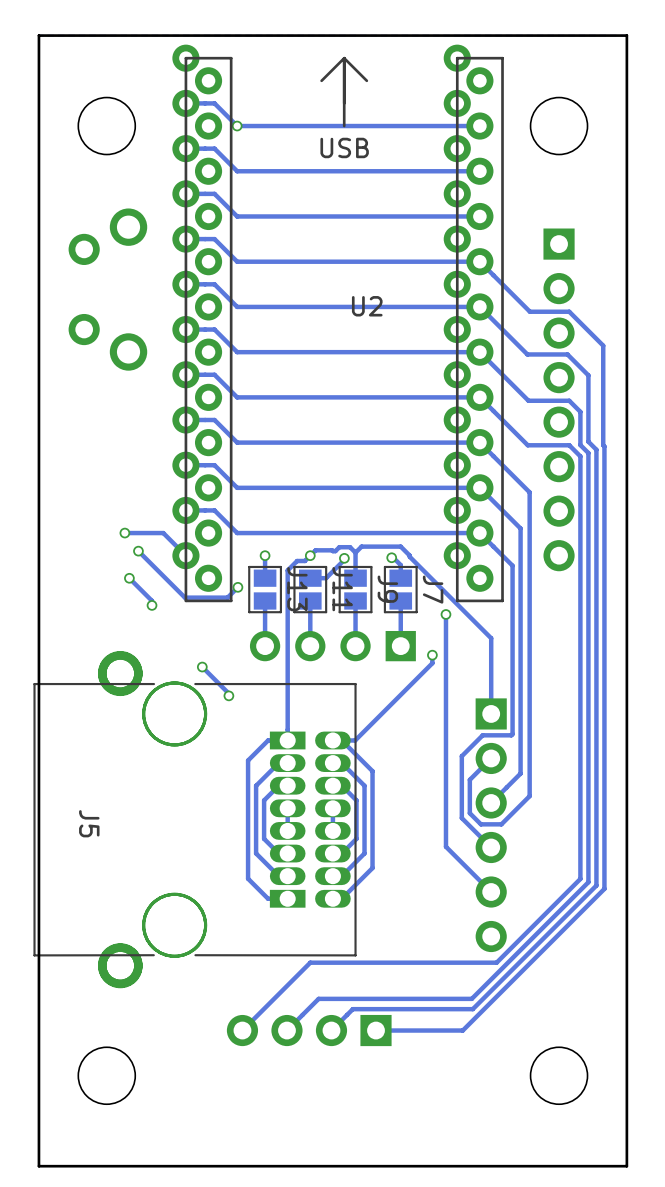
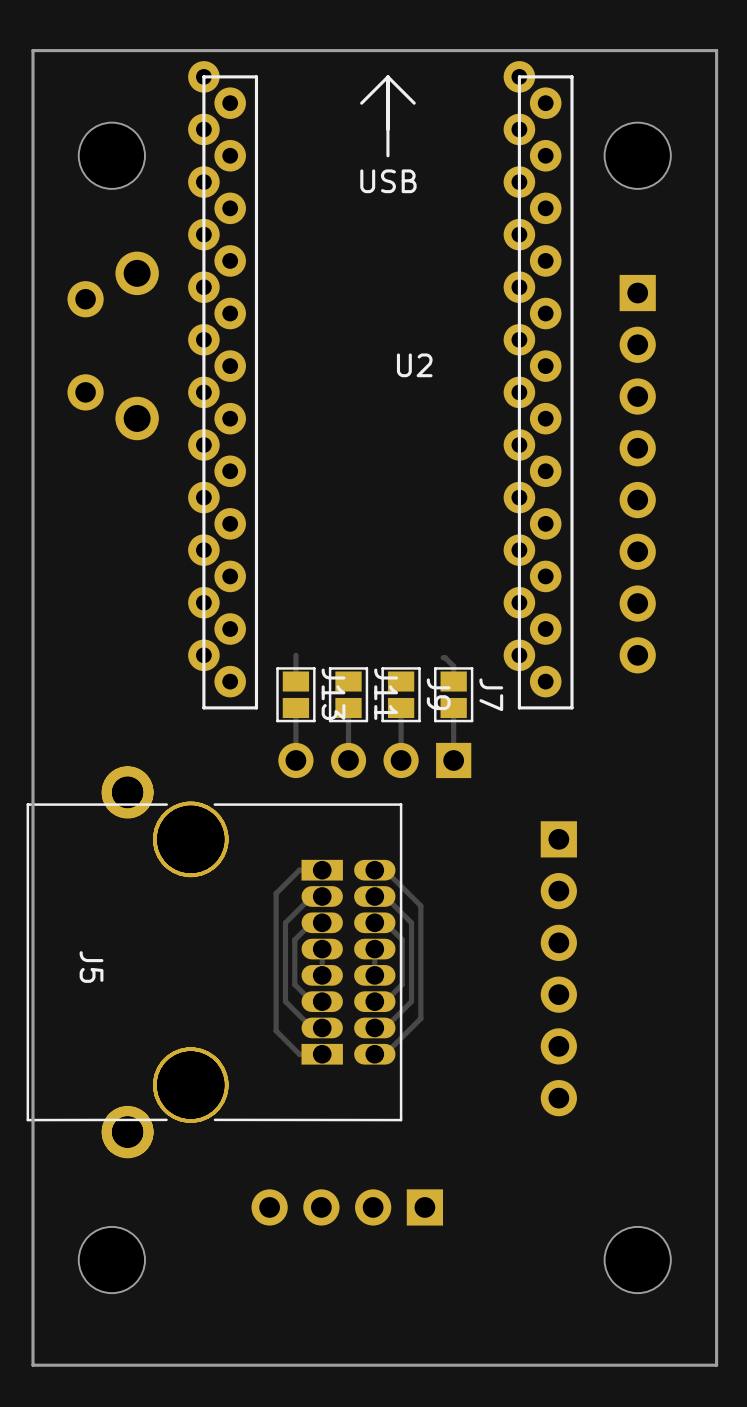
track: (185, 103) (214, 103) (237, 126) (479, 126) -> none
via: (237, 126) -> none
track: (185, 148) (214, 148) (237, 171) (479, 171) -> none
track: (185, 193) (214, 193) (237, 216) (479, 216) -> none
track: (185, 239) (214, 239) (237, 261) (479, 261) (529, 311) (569, 311) (603, 345) (604, 888) (462, 1030) (376, 1030) -> none
track: (185, 284) (214, 284) (237, 306) (479, 306) (527, 354) (567, 354) (588, 375) (588, 441) (596, 449) (596, 885) (472, 1009) (352, 1009) (331, 1030) -> none
track: (185, 329) (214, 329) (237, 352) (479, 352) (528, 400) (569, 400) (580, 411) (580, 445) (588, 453) (588, 882) (471, 998) (318, 998) (286, 1030) -> none
track: (185, 374) (214, 374) (237, 397) (479, 397) (527, 445) (569, 445) (580, 456) (580, 878) (496, 962) (310, 962) (242, 1030) -> none
track: (185, 419) (214, 419) (237, 442) (479, 442) (529, 492) (529, 796) (501, 824) (480, 824) (469, 813) (469, 779) (491, 758) -> none
track: (185, 465) (214, 465) (237, 487) (479, 487) (520, 528) (520, 773) (491, 802) -> none
track: (185, 510) (214, 510) (237, 533) (479, 533) (512, 565) (512, 734) (482, 735) (461, 756) (461, 818) (491, 847) -> none
track: (124, 533) (163, 533) (185, 555) -> none
via: (124, 533) -> none
track: (138, 551) (184, 597) (227, 597) (237, 587) -> none
via: (138, 551) -> none
track: (355, 552) (361, 546) (400, 546) (491, 638) (491, 713) -> none
track: (355, 552) (350, 547) (339, 547) (335, 551) (315, 550) (304, 561) (297, 561) (287, 570) (287, 740) -> none
track: (355, 552) (355, 578) -> none
via: (265, 555) -> none
via: (310, 555) -> none
via: (391, 557) -> none
track: (344, 558) (326, 578) (310, 578) -> none
via: (344, 558) -> none
track: (129, 578) (152, 600) (152, 605) -> none
via: (129, 578) -> none
via: (237, 587) -> none
via: (152, 605) -> none
track: (445, 614) (445, 846) (491, 892) -> none
via: (445, 614) -> none
track: (432, 655) (432, 663) (355, 740) (341, 740) -> none
via: (432, 655) -> none
track: (202, 667) (228, 693) (228, 695) -> none
via: (202, 667) -> none
via: (228, 695) -> none

